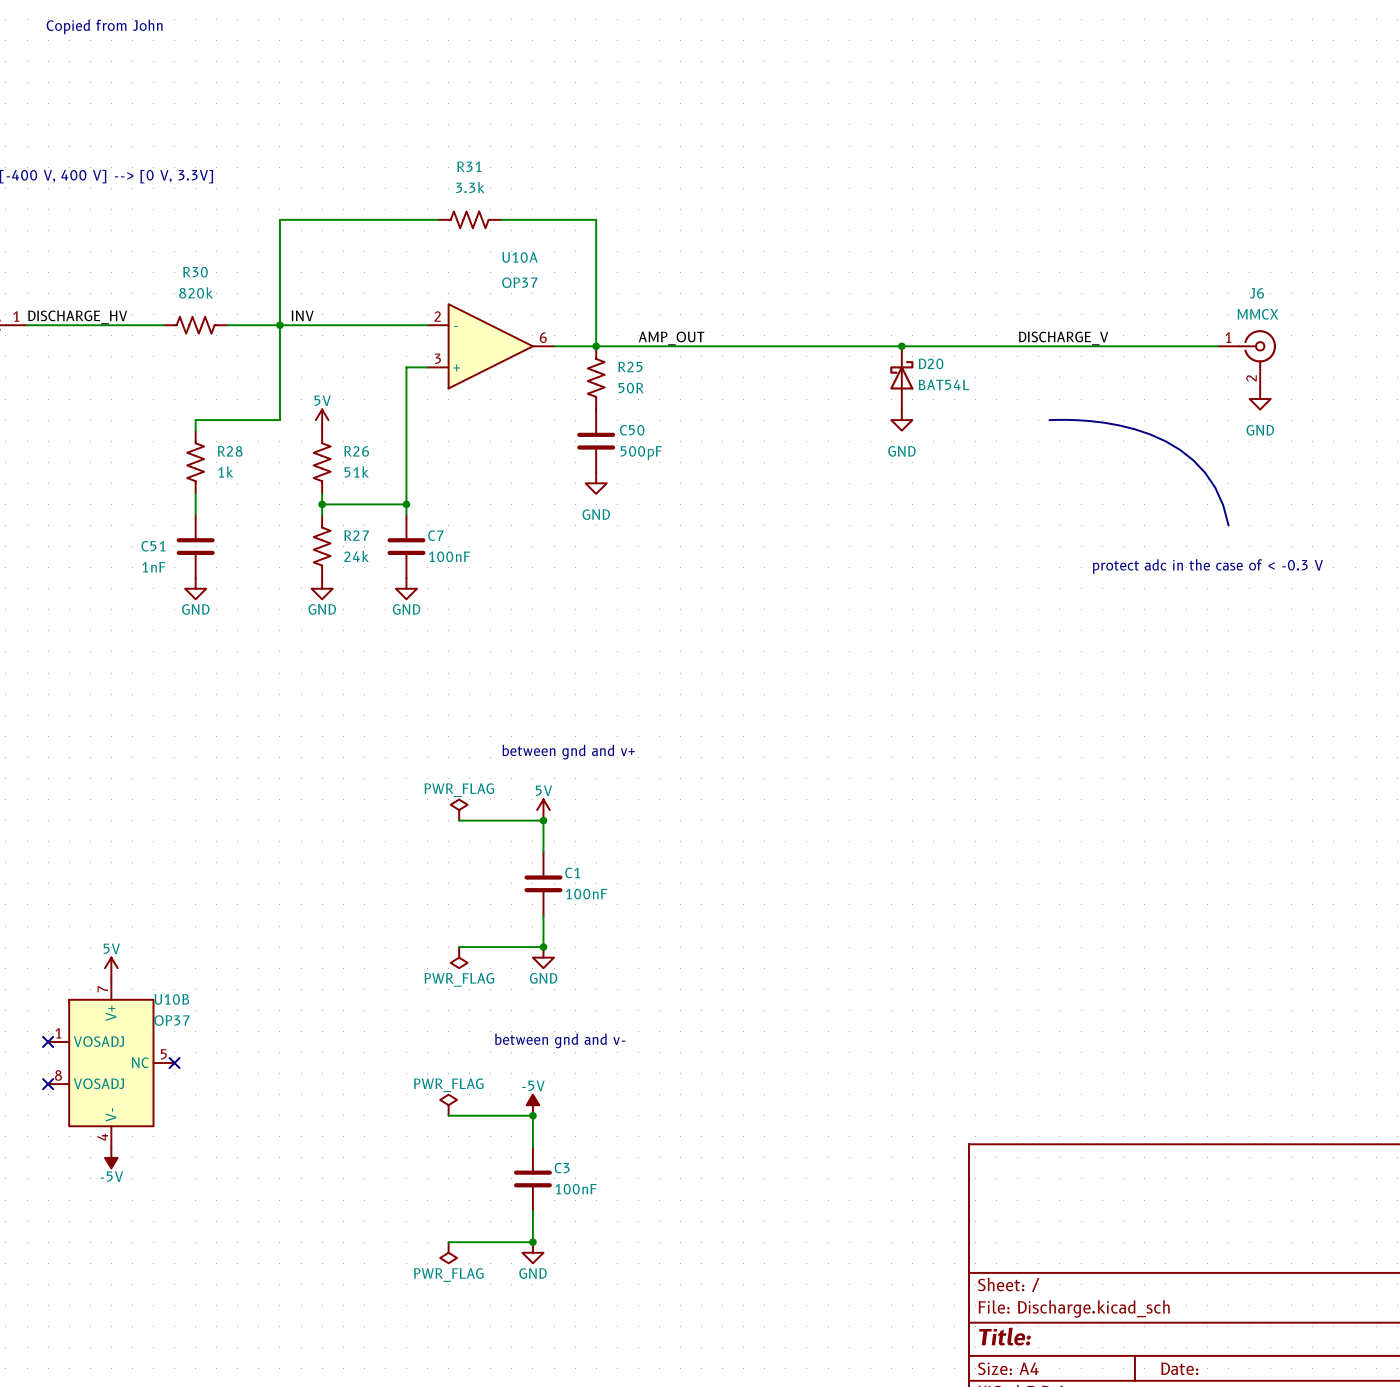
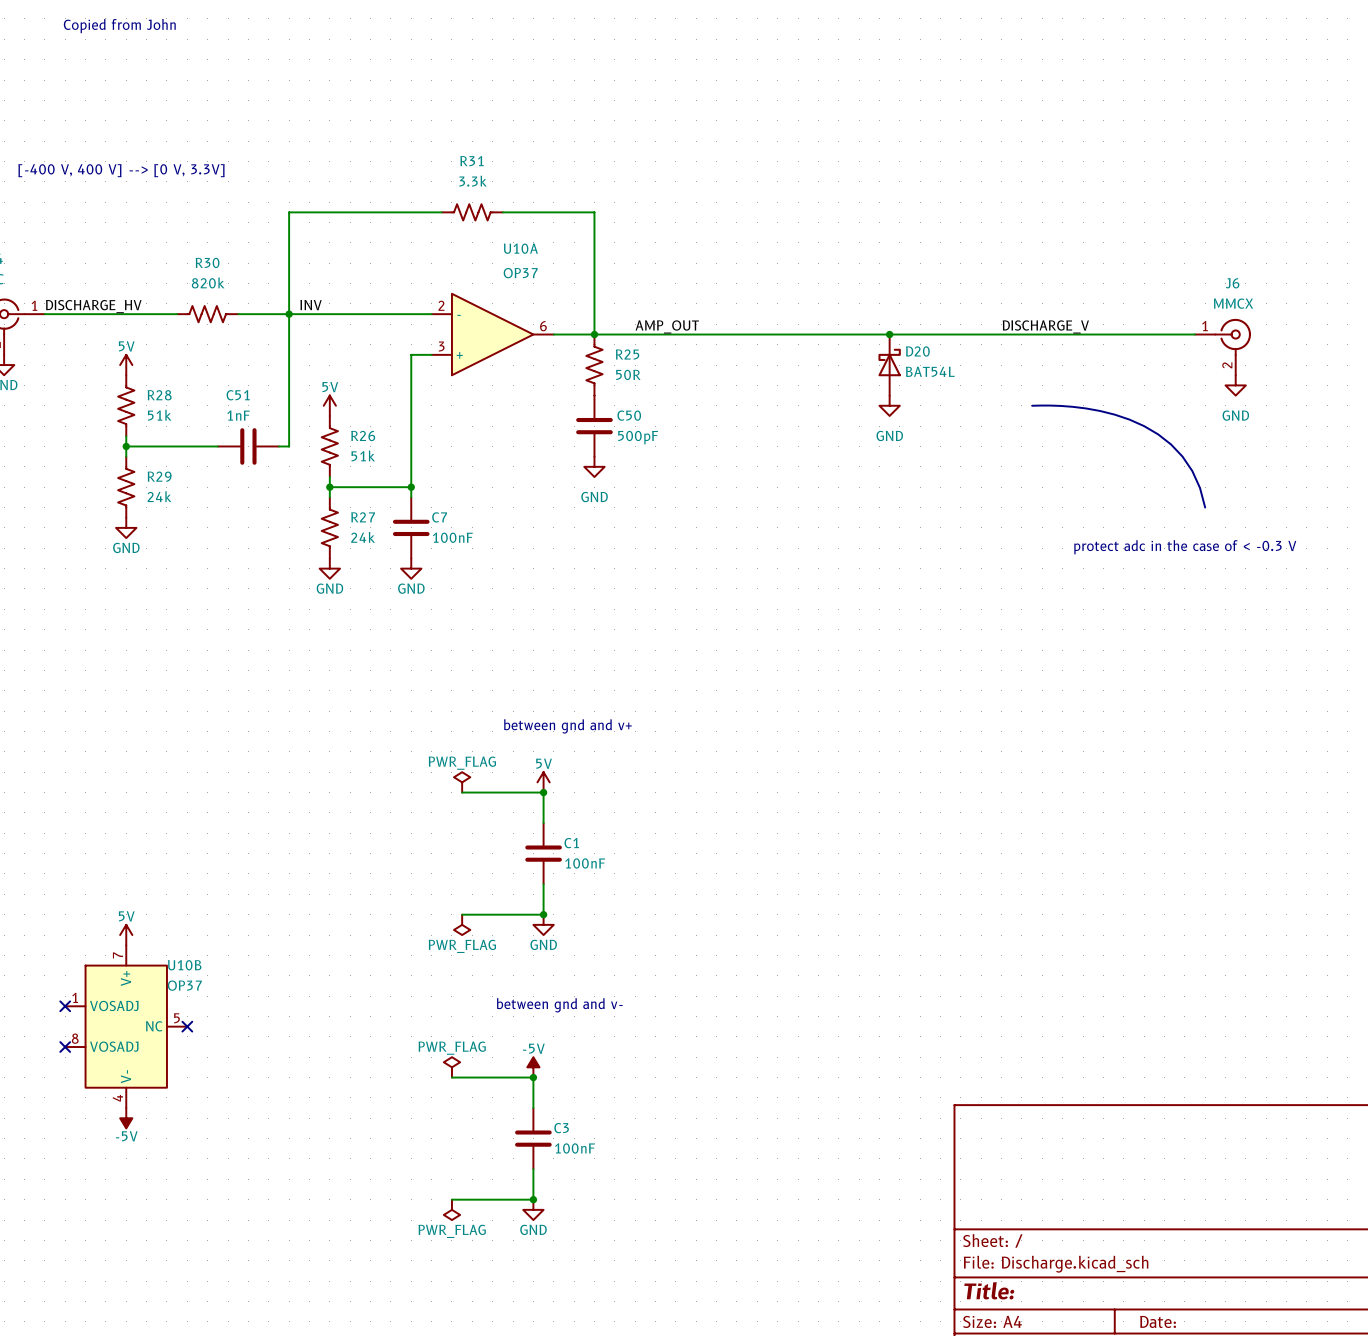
power symbol: none -> 5V (126, 365)
wire: (279, 420) (195, 420) (195, 430) -> (289, 405) (289, 446) (278, 446)
wire: none -> (126, 446) (217, 446)
junction: none -> (126, 446)
R28 position: (195, 462) -> (126, 405)
R28 value: 1k (225, 472) -> 51k (159, 415)
wire: (195, 493) (195, 514) -> (126, 436) (126, 456)
R29: none -> 24k (126, 487)
C51 name position: C51 (153, 546) -> C51 (238, 395)
C51 rotation: 0° (195, 546) -> 90° clockwise (248, 446)
C51 position: (195, 546) -> (248, 446)
power symbol position: GND (195, 588) -> GND (126, 527)

